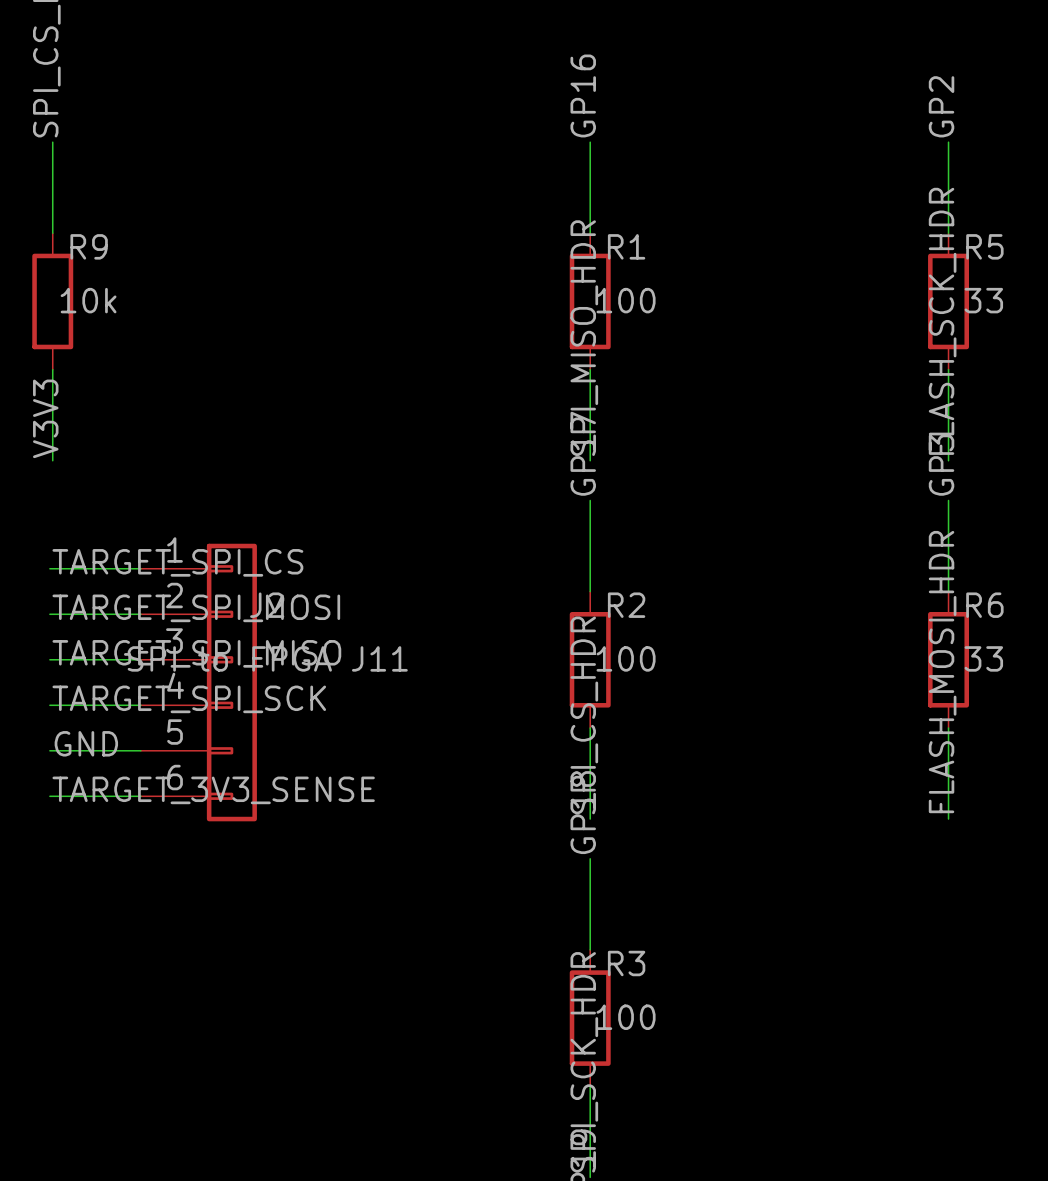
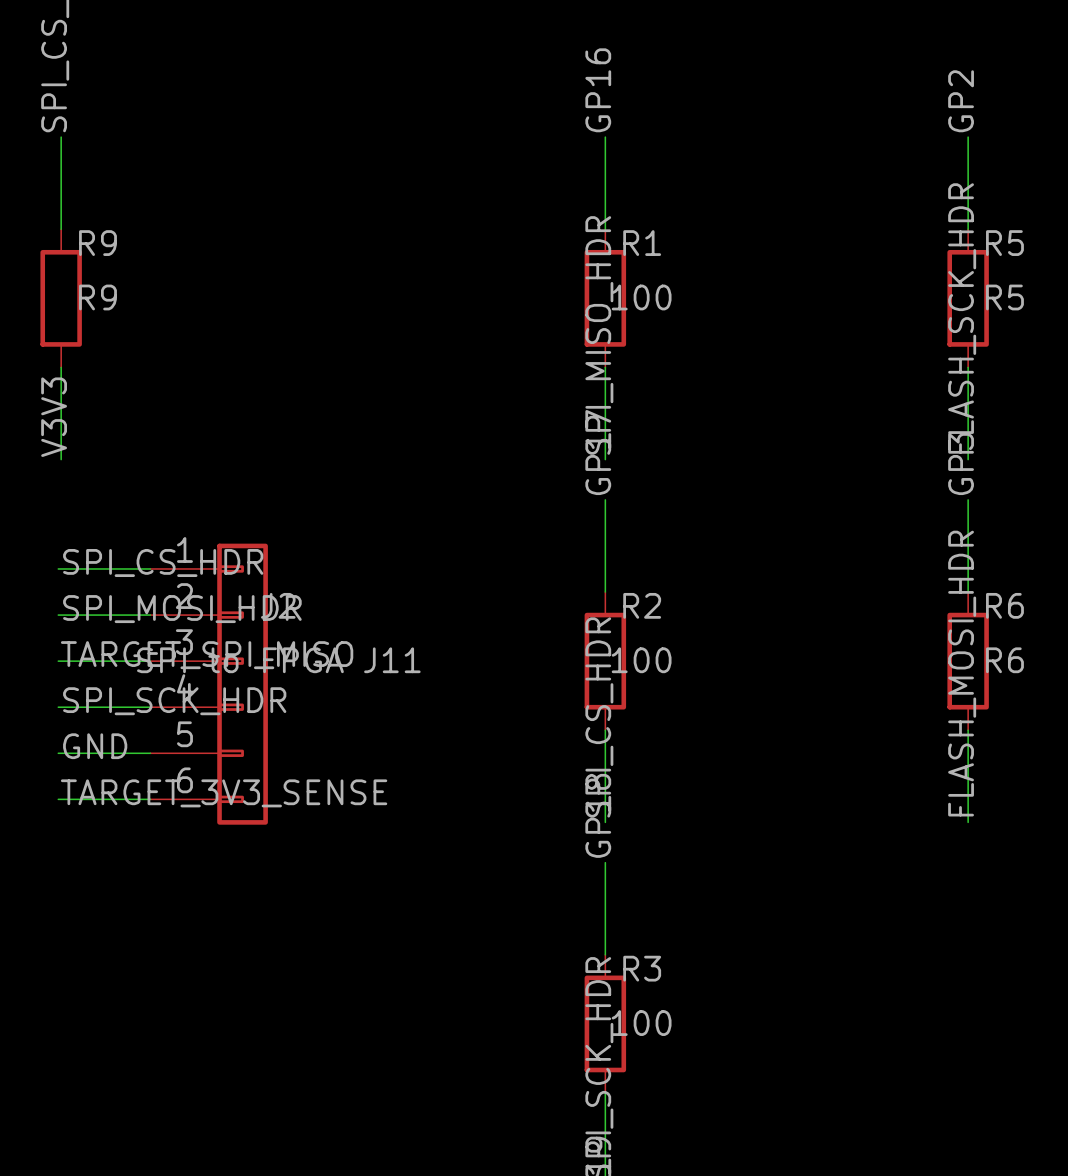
R9 value: 10k (88, 300) -> R9 (97, 297)
R5 value: 33 (983, 300) -> R5 (1004, 297)
label: TARGET_SPI_CS (177, 562) -> SPI_CS_HDR (163, 563)
label: TARGET_SPI_MOSI (196, 608) -> SPI_MOSI_HDR (182, 609)
R6 value: 33 (983, 658) -> R6 (1004, 660)
label: TARGET_SPI_SCK (189, 699) -> SPI_SCK_HDR (174, 701)

